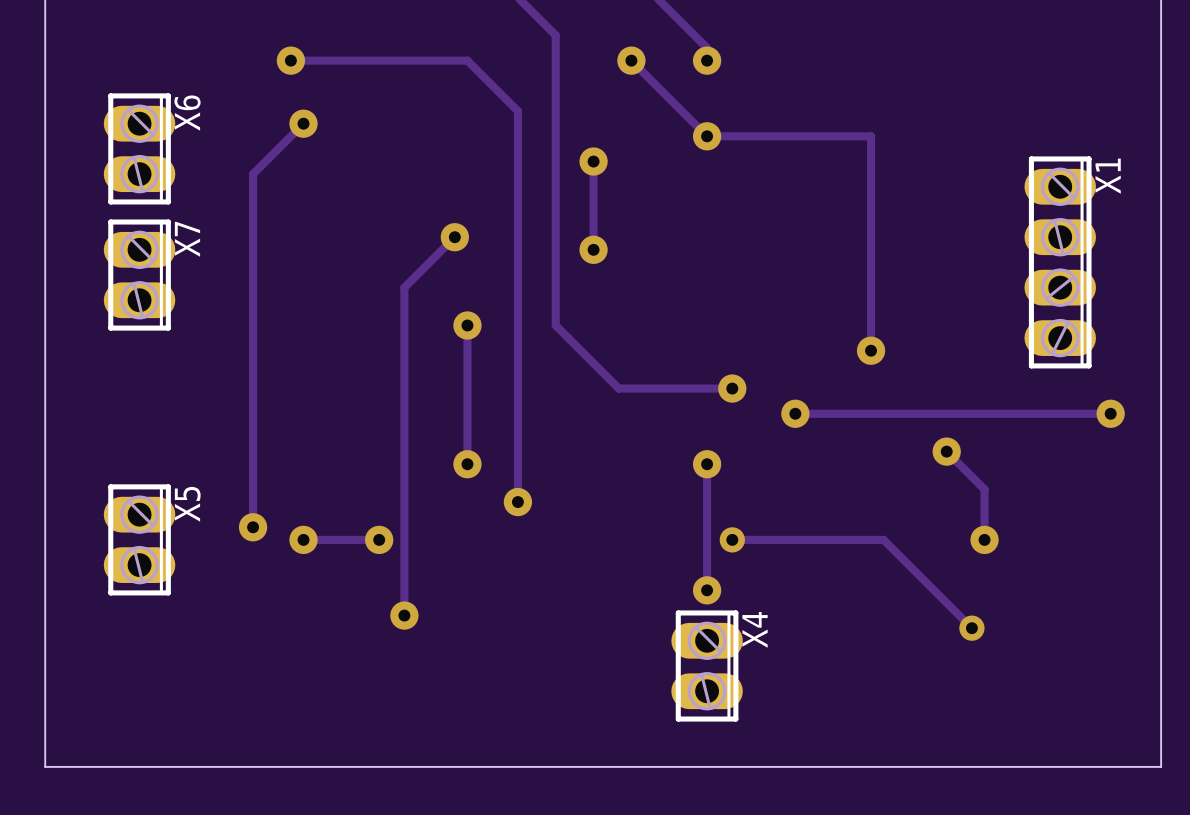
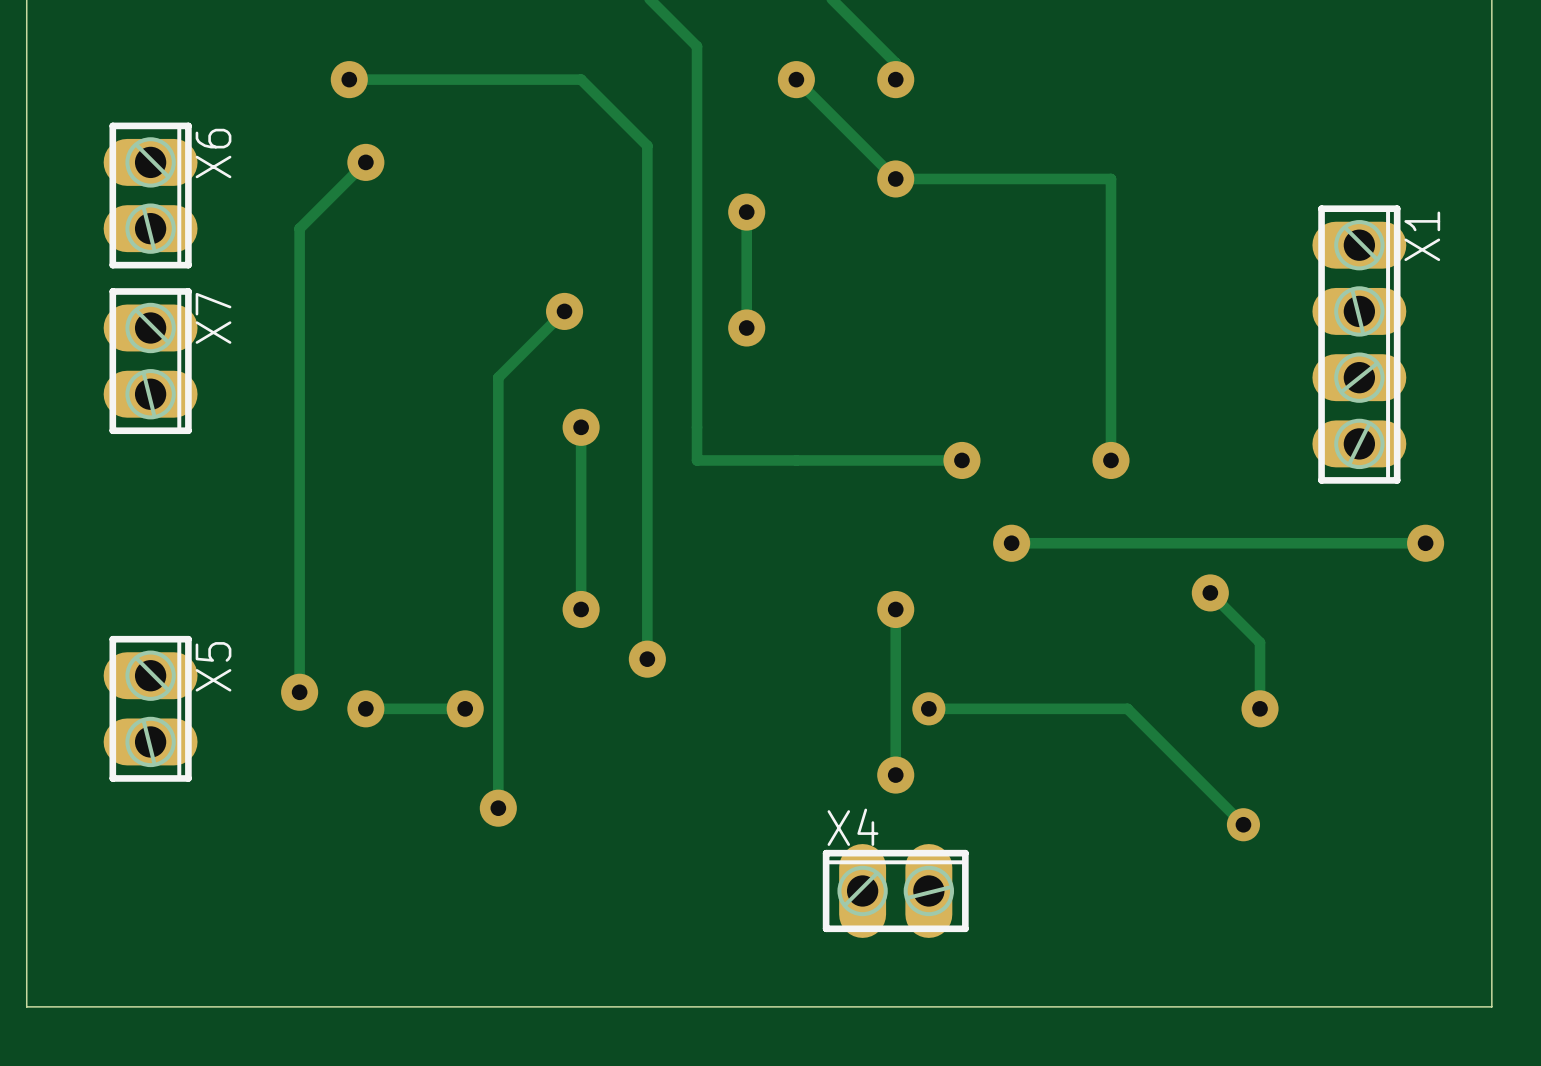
track: (555, 325) (618, 388) (732, 388) -> (697, 427) (697, 460) (961, 460)
via position: (732, 388) -> (961, 460)
X4 rotation: 0° (707, 666) -> 90° counterclockwise (895, 890)

